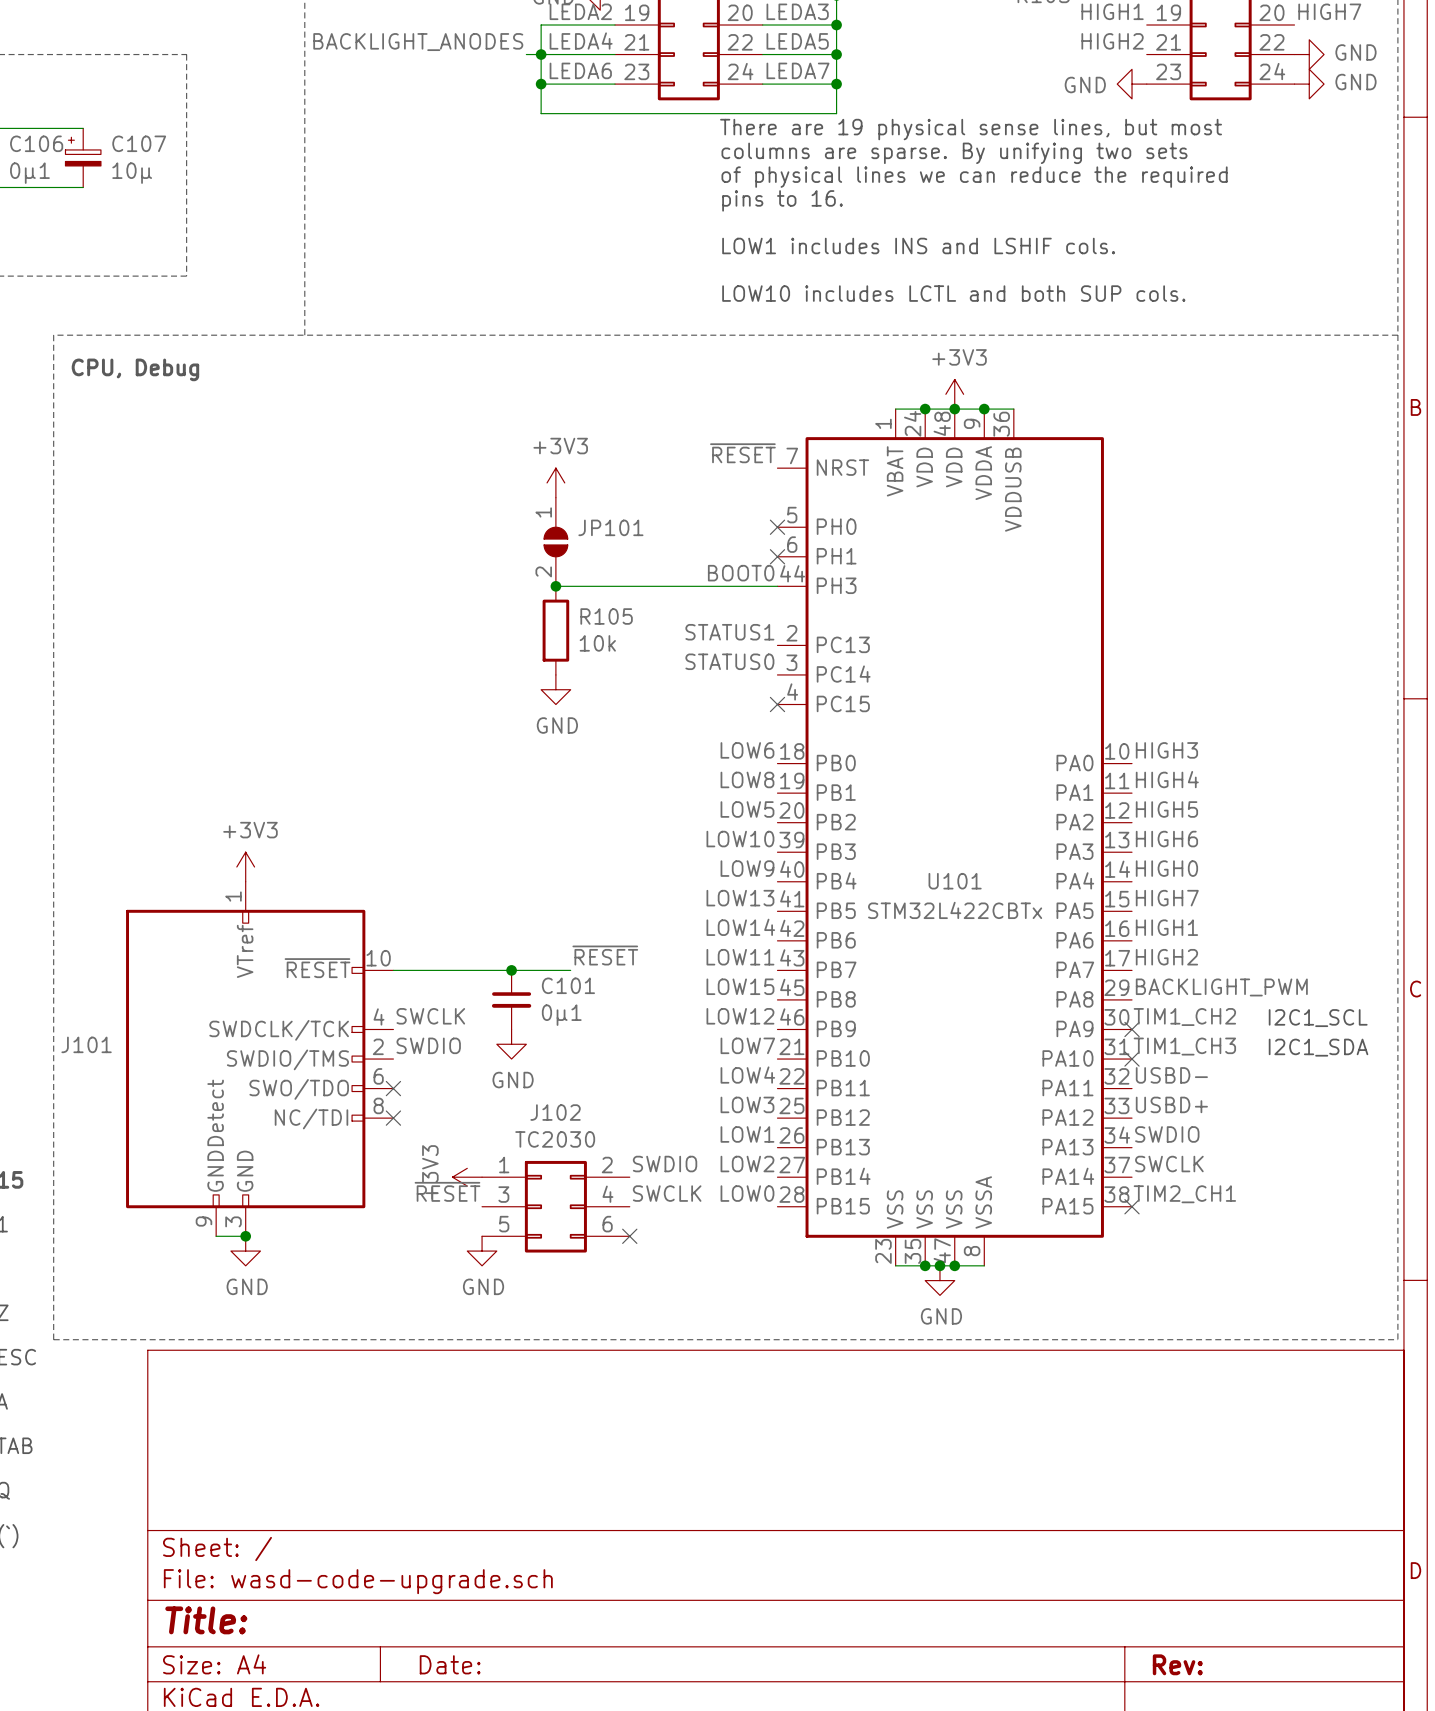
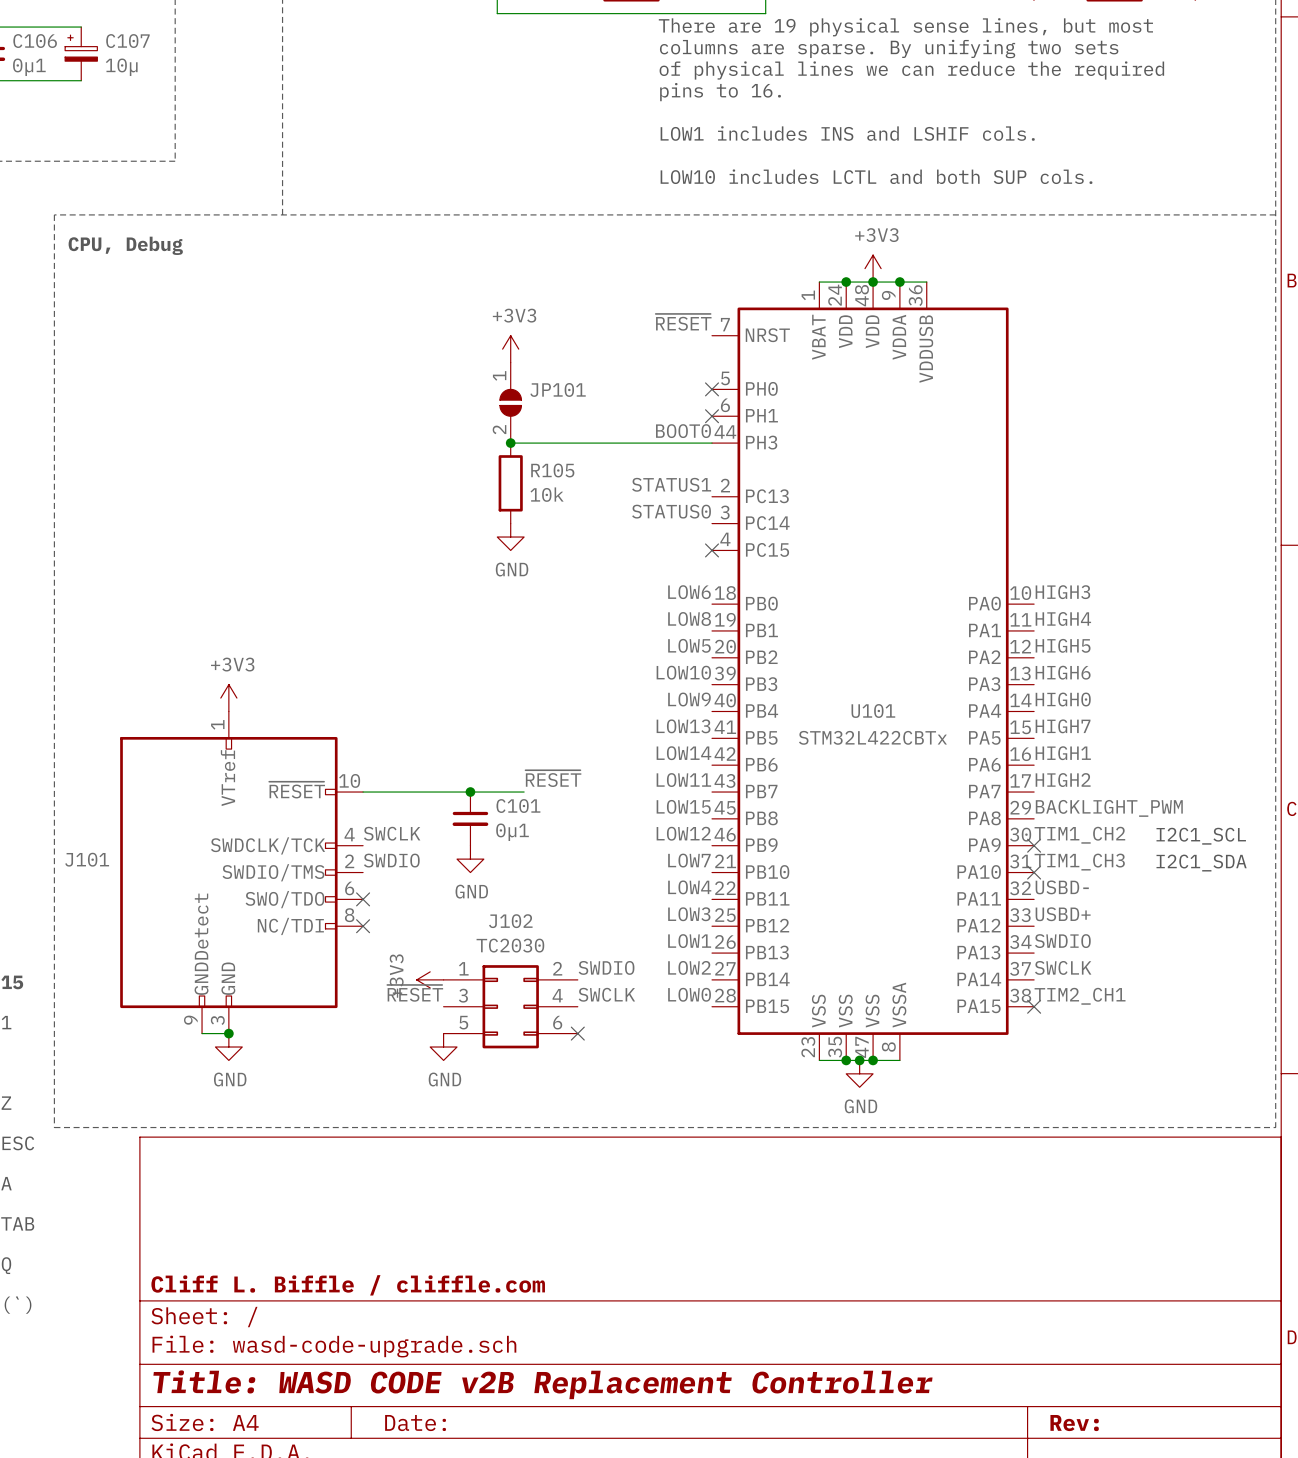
title block: none -> Cliff L. Biffle / cliffle.com (348, 1285)
title block: Title: (206, 1620) -> Title: WASD CODE v2B Replacement Controller (542, 1384)

